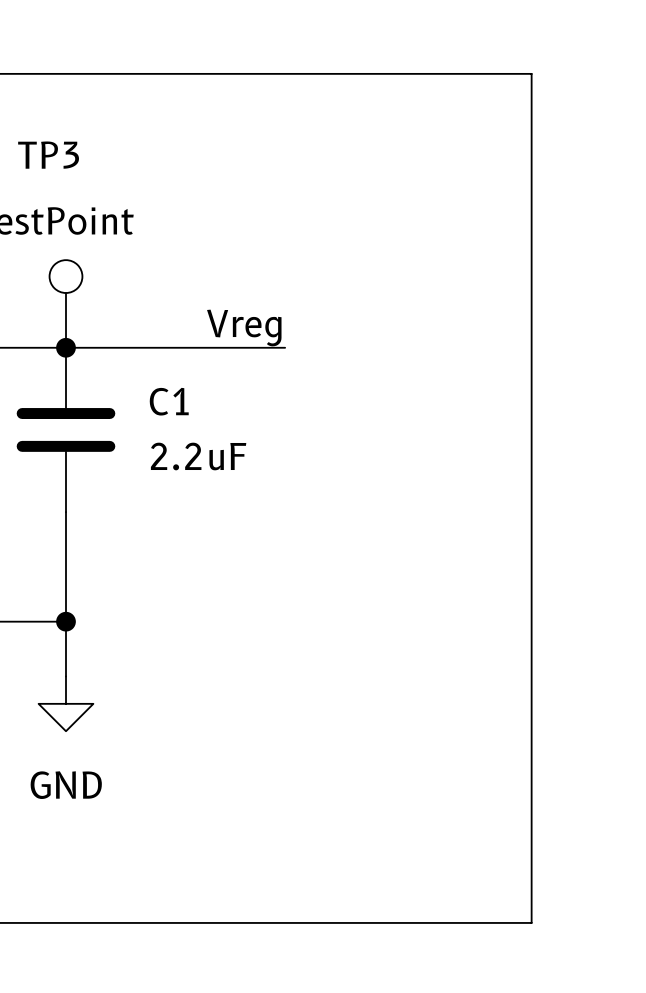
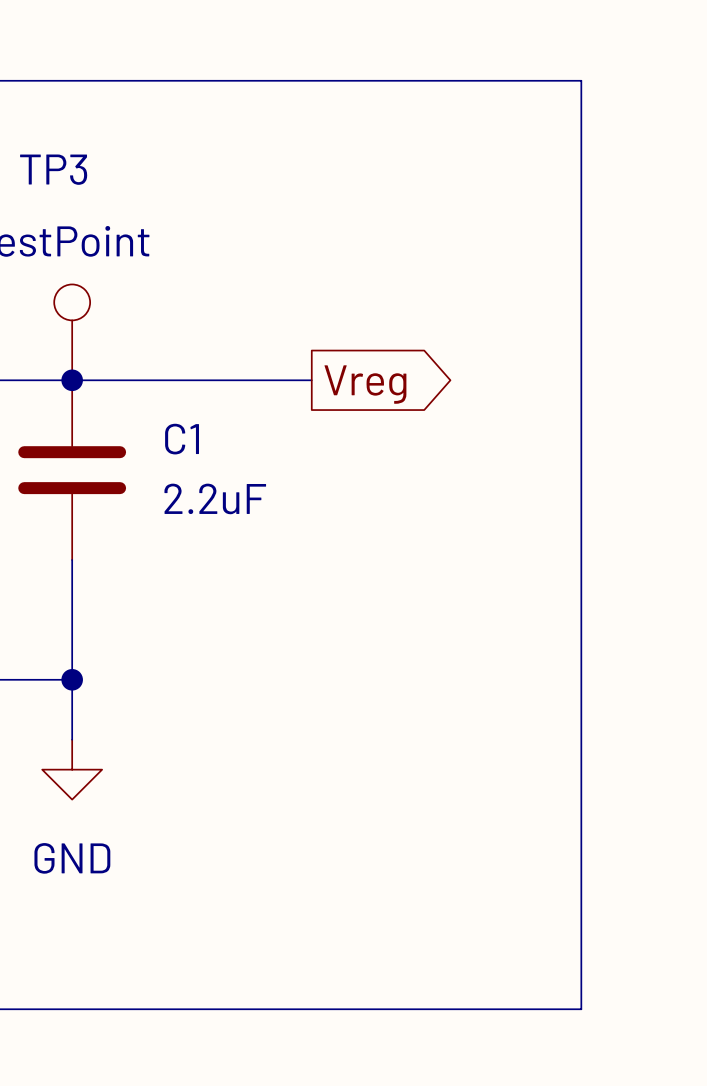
label: Vreg (244, 327) -> none
global label: none -> Vreg (365, 384)

